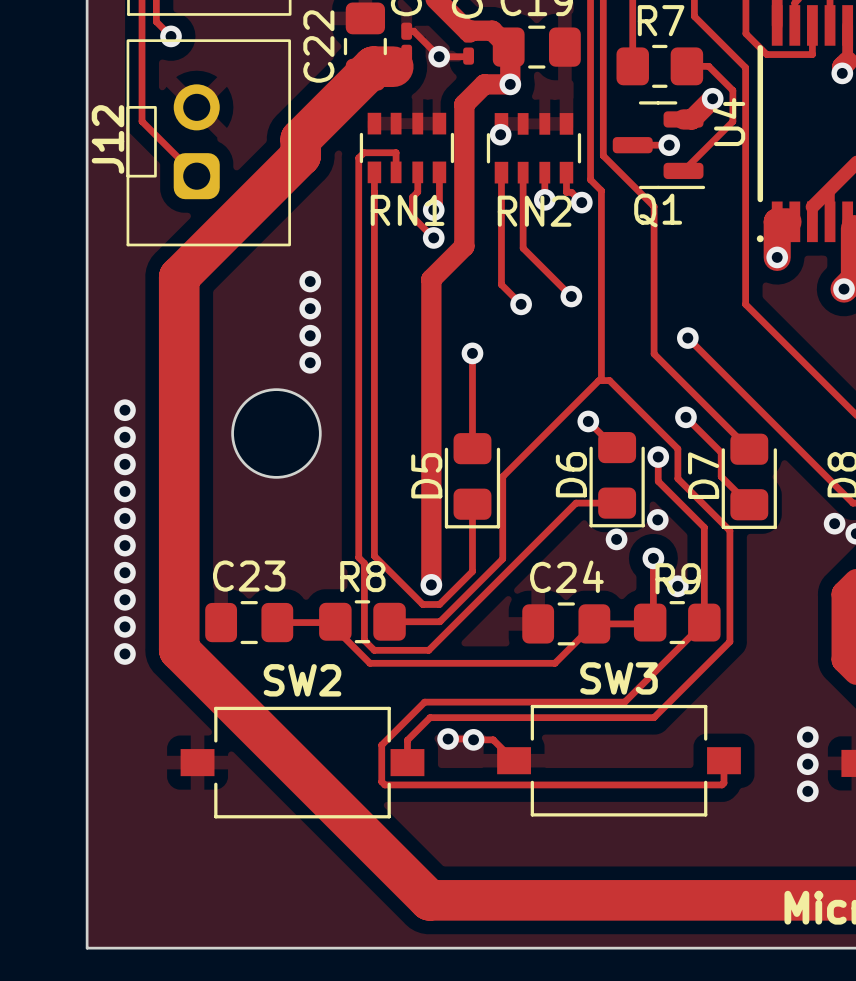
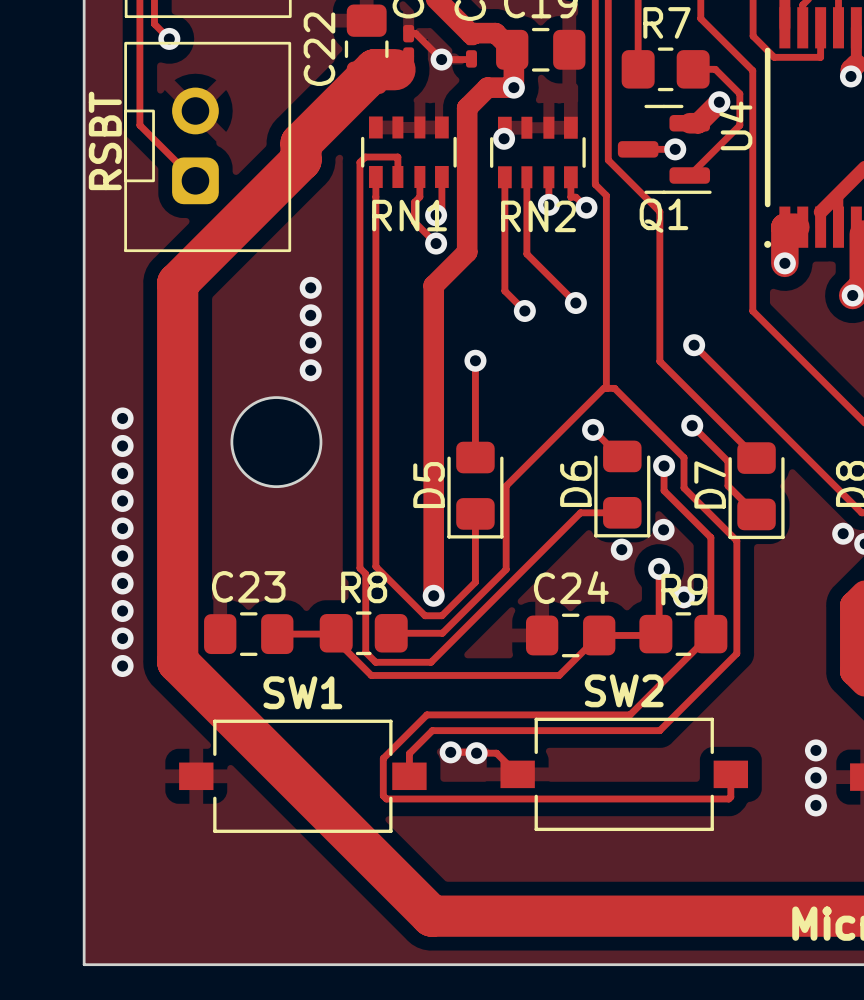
J12 name: J12 (107, 139) -> RSBT (105, 140)
SW3 name: SW3 (619, 678) -> SW2 (624, 690)
SW2 name: SW2 (302, 680) -> SW1 (302, 692)

